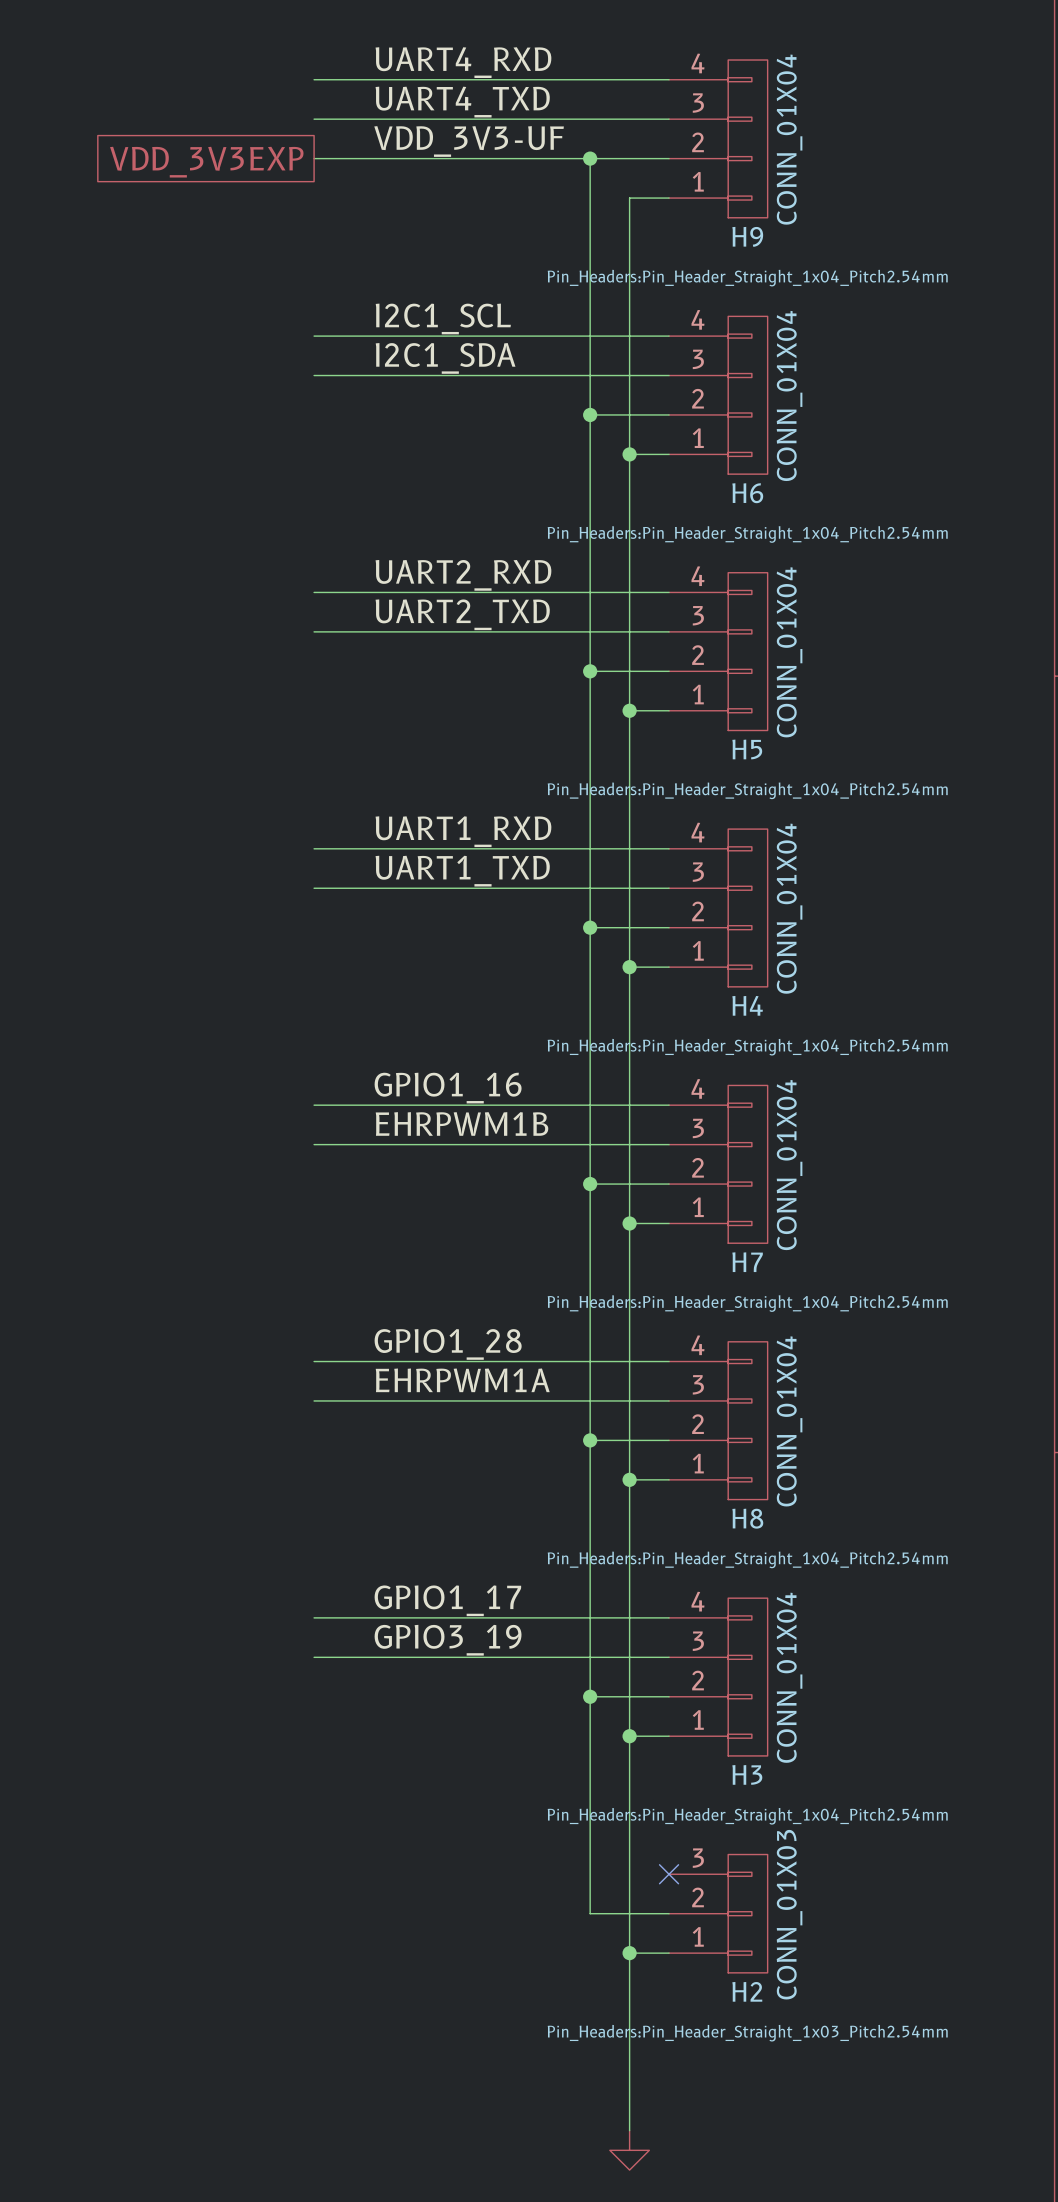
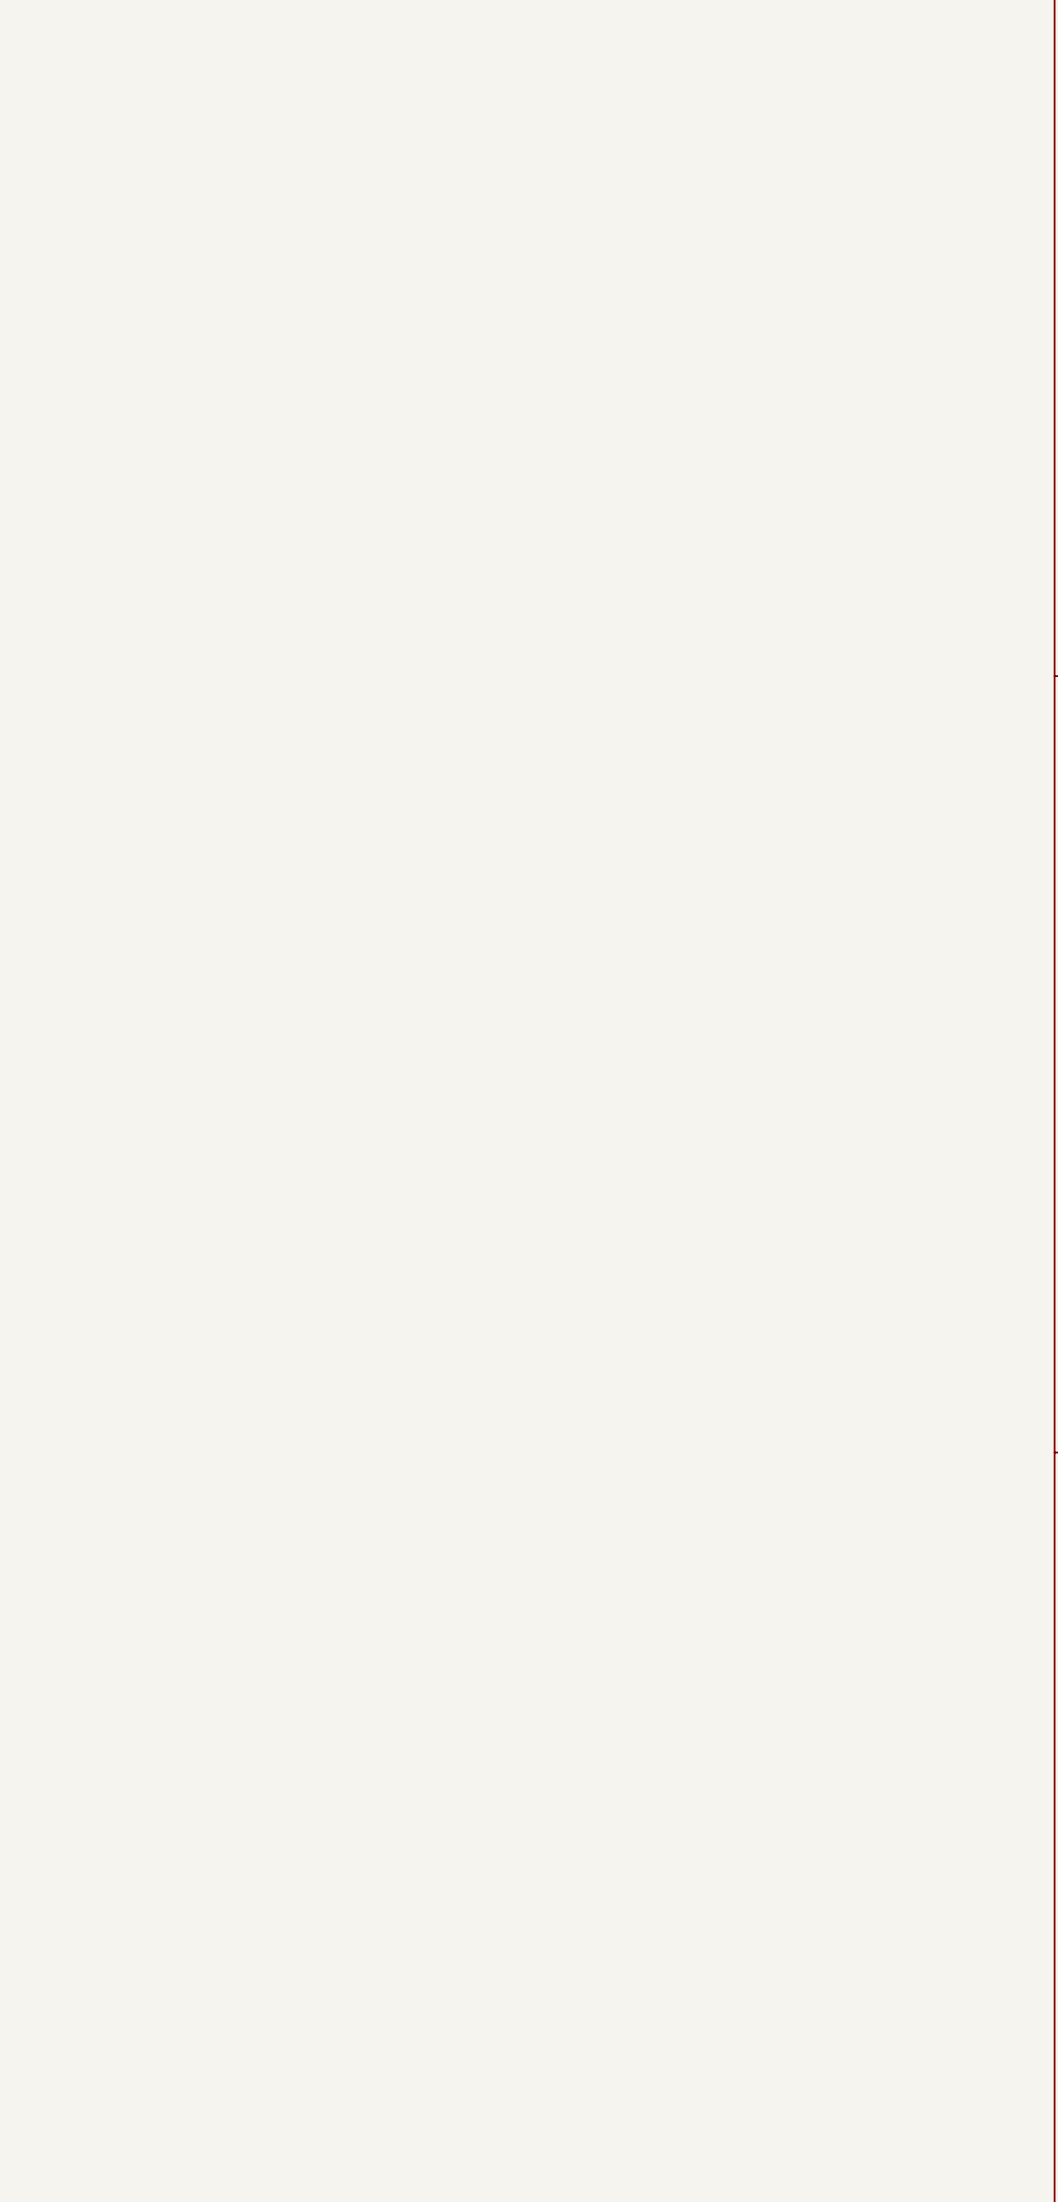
label: UART4_RXD (463, 62) -> none
wire: (314, 79) (669, 79) -> none
label: UART4_TXD (462, 102) -> none
wire: (314, 119) (669, 119) -> none
H9: CONN_01X04 (718, 138) -> none
label: VDD_3V3-UF (469, 141) -> none
wire: (314, 158) (669, 158) -> none
wire: (590, 158) (590, 1913) (669, 1913) -> none
junction: (590, 158) -> none
global label: VDD_3V3EXP (206, 162) -> none
wire: (669, 198) (629, 198) (629, 2130) -> none
label: I2C1_SCL (443, 318) -> none
wire: (314, 336) (669, 336) -> none
label: I2C1_SDA (445, 358) -> none
wire: (314, 375) (669, 375) -> none
H6: CONN_01X04 (718, 395) -> none
wire: (590, 414) (669, 414) -> none
junction: (590, 414) -> none
wire: (629, 454) (669, 454) -> none
junction: (629, 454) -> none
label: UART2_RXD (463, 575) -> none
wire: (314, 592) (669, 592) -> none
label: UART2_TXD (462, 614) -> none
wire: (314, 631) (669, 631) -> none
H5: CONN_01X04 (718, 651) -> none
wire: (590, 671) (669, 671) -> none
junction: (590, 671) -> none
wire: (629, 710) (669, 710) -> none
junction: (629, 710) -> none
label: UART1_RXD (463, 831) -> none
wire: (314, 848) (669, 848) -> none
label: UART1_TXD (462, 871) -> none
wire: (314, 888) (669, 888) -> none
H4: CONN_01X04 (718, 907) -> none
wire: (590, 927) (669, 927) -> none
junction: (590, 927) -> none
wire: (629, 967) (669, 967) -> none
junction: (629, 967) -> none
label: GPIO1_16 (448, 1088) -> none
wire: (314, 1105) (669, 1105) -> none
label: EHRPWM1B (461, 1123) -> none
wire: (314, 1144) (669, 1144) -> none
H7: CONN_01X04 (718, 1164) -> none
wire: (590, 1184) (669, 1184) -> none
junction: (590, 1184) -> none
wire: (629, 1223) (669, 1223) -> none
junction: (629, 1223) -> none
label: GPIO1_28 (448, 1344) -> none
wire: (314, 1361) (669, 1361) -> none
label: EHRPWM1A (462, 1380) -> none
wire: (314, 1400) (669, 1400) -> none
H8: CONN_01X04 (718, 1420) -> none
wire: (590, 1440) (669, 1440) -> none
junction: (590, 1440) -> none
wire: (629, 1479) (669, 1479) -> none
junction: (629, 1479) -> none
label: GPIO1_17 (447, 1600) -> none
wire: (314, 1617) (669, 1617) -> none
label: GPIO3_19 (448, 1640) -> none
wire: (314, 1657) (669, 1657) -> none
H3: CONN_01X04 (718, 1677) -> none
wire: (590, 1696) (669, 1696) -> none
junction: (590, 1696) -> none
wire: (629, 1736) (669, 1736) -> none
junction: (629, 1736) -> none
no-connect mark: (669, 1874) -> none
H2: CONN_01X03 (718, 1913) -> none
wire: (629, 1953) (669, 1953) -> none
junction: (629, 1953) -> none
power symbol: (629, 2150) -> none

